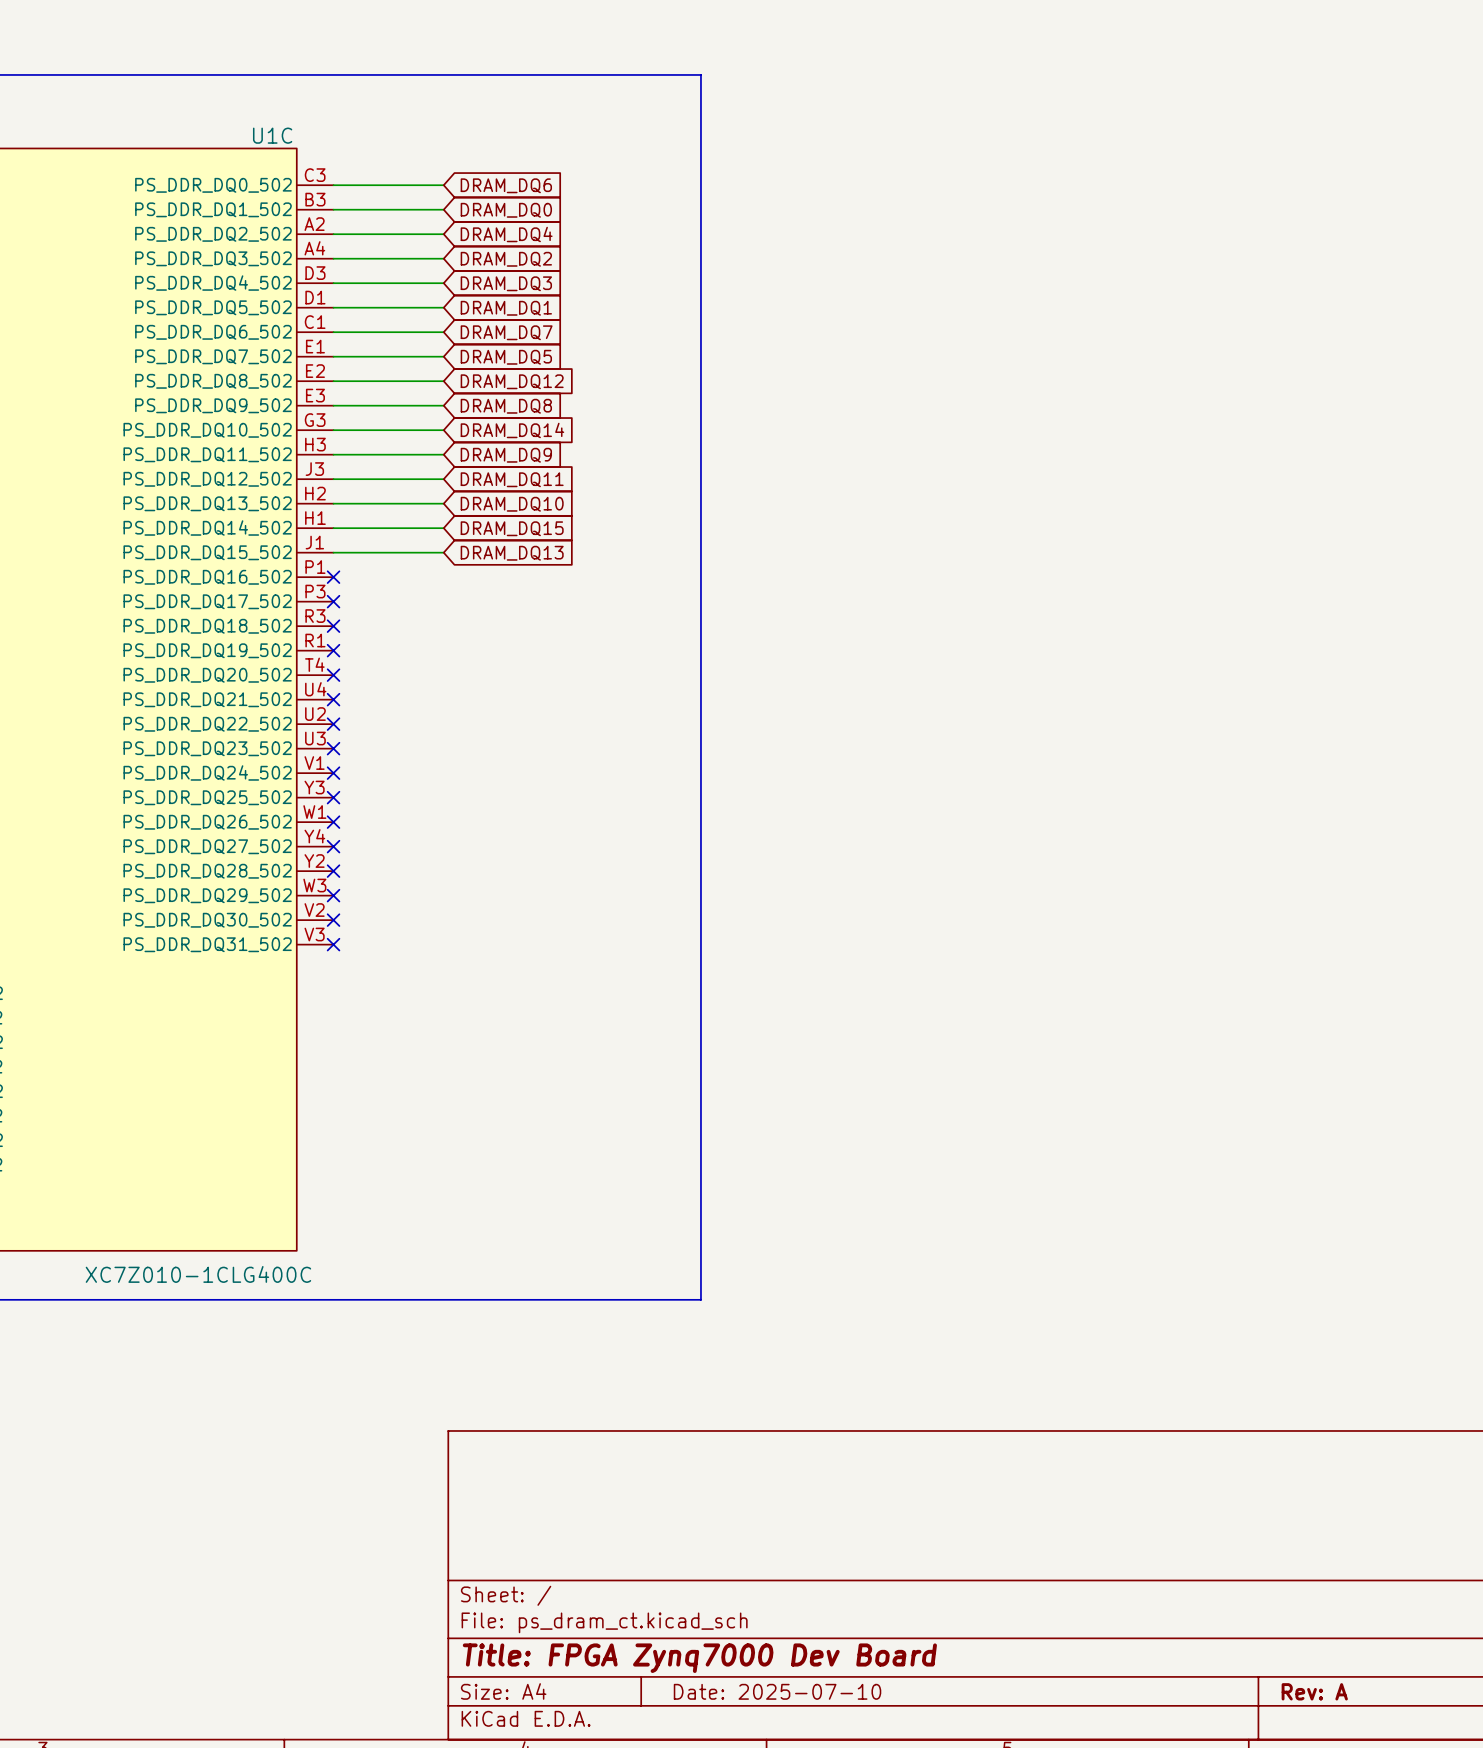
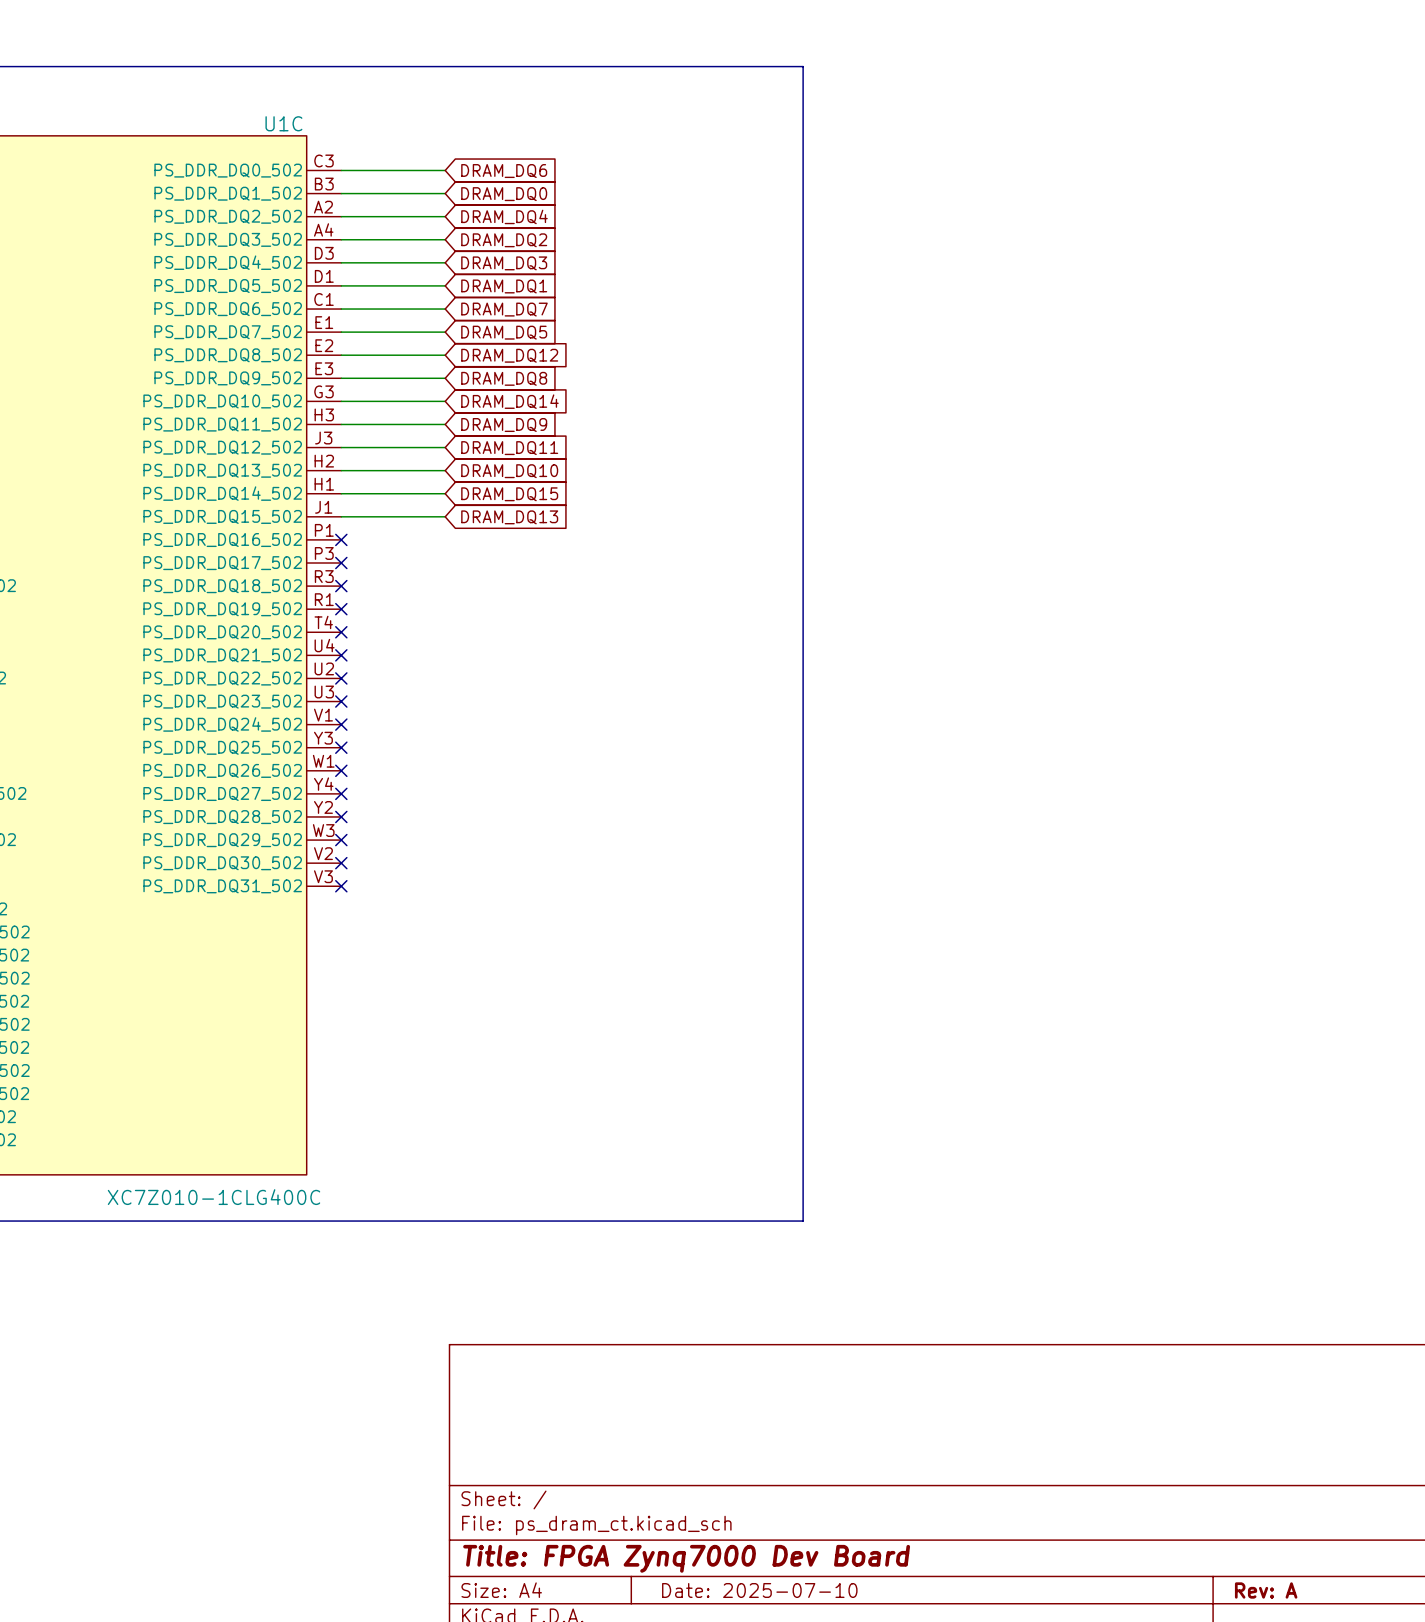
line: (700, 74) (700, 1299) -> (687, 66) (803, 66) (803, 1221) (687, 1221)

